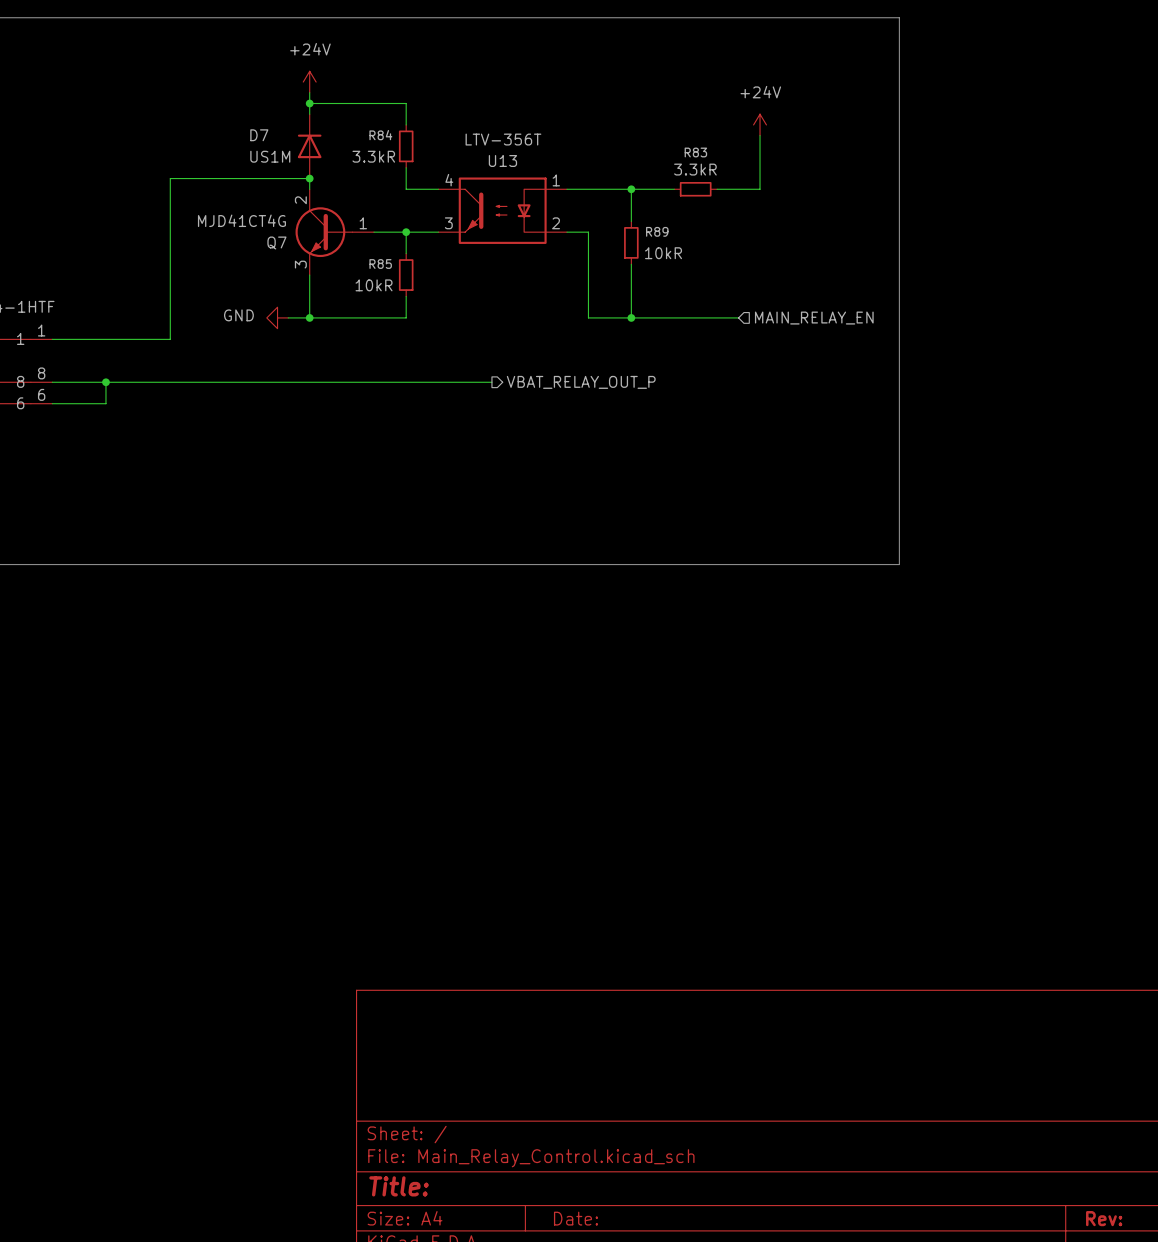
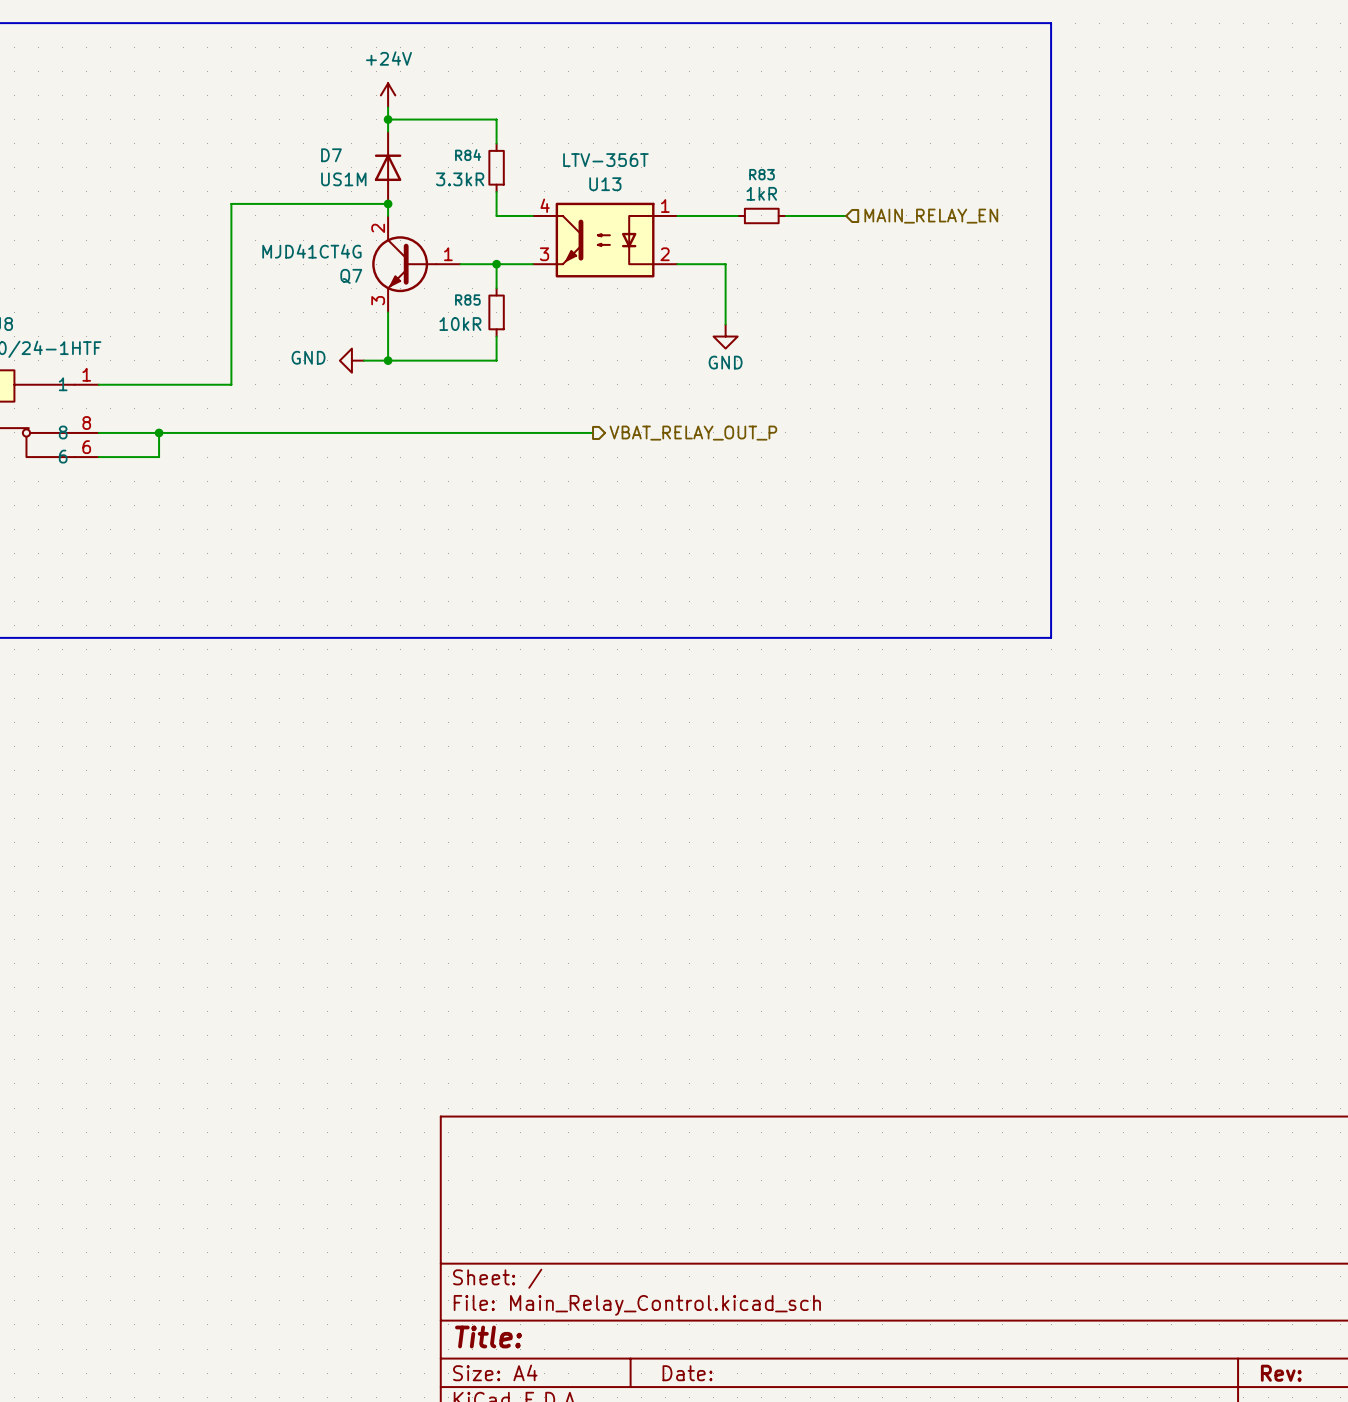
power symbol: +24V (760, 124) -> none
wire: (760, 135) (760, 189) (717, 189) -> (797, 215) (846, 215)
R83 value: 3.3kR (695, 169) -> 1kR (761, 193)
wire: (620, 189) (663, 189) -> none
wire: (631, 189) (631, 221) -> none
junction: (631, 189) -> none
R83 position: (695, 189) -> (761, 215)
wire: (588, 232) (588, 317) (738, 317) -> (701, 264) (725, 264) (725, 324)
R89: 10kR (631, 242) -> none
wire: (631, 264) (631, 317) -> none
power symbol: none -> GND (725, 336)
junction: (631, 317) -> none
hierarchical label position: MAIN_RELAY_EN (814, 318) -> MAIN_RELAY_EN (931, 216)

